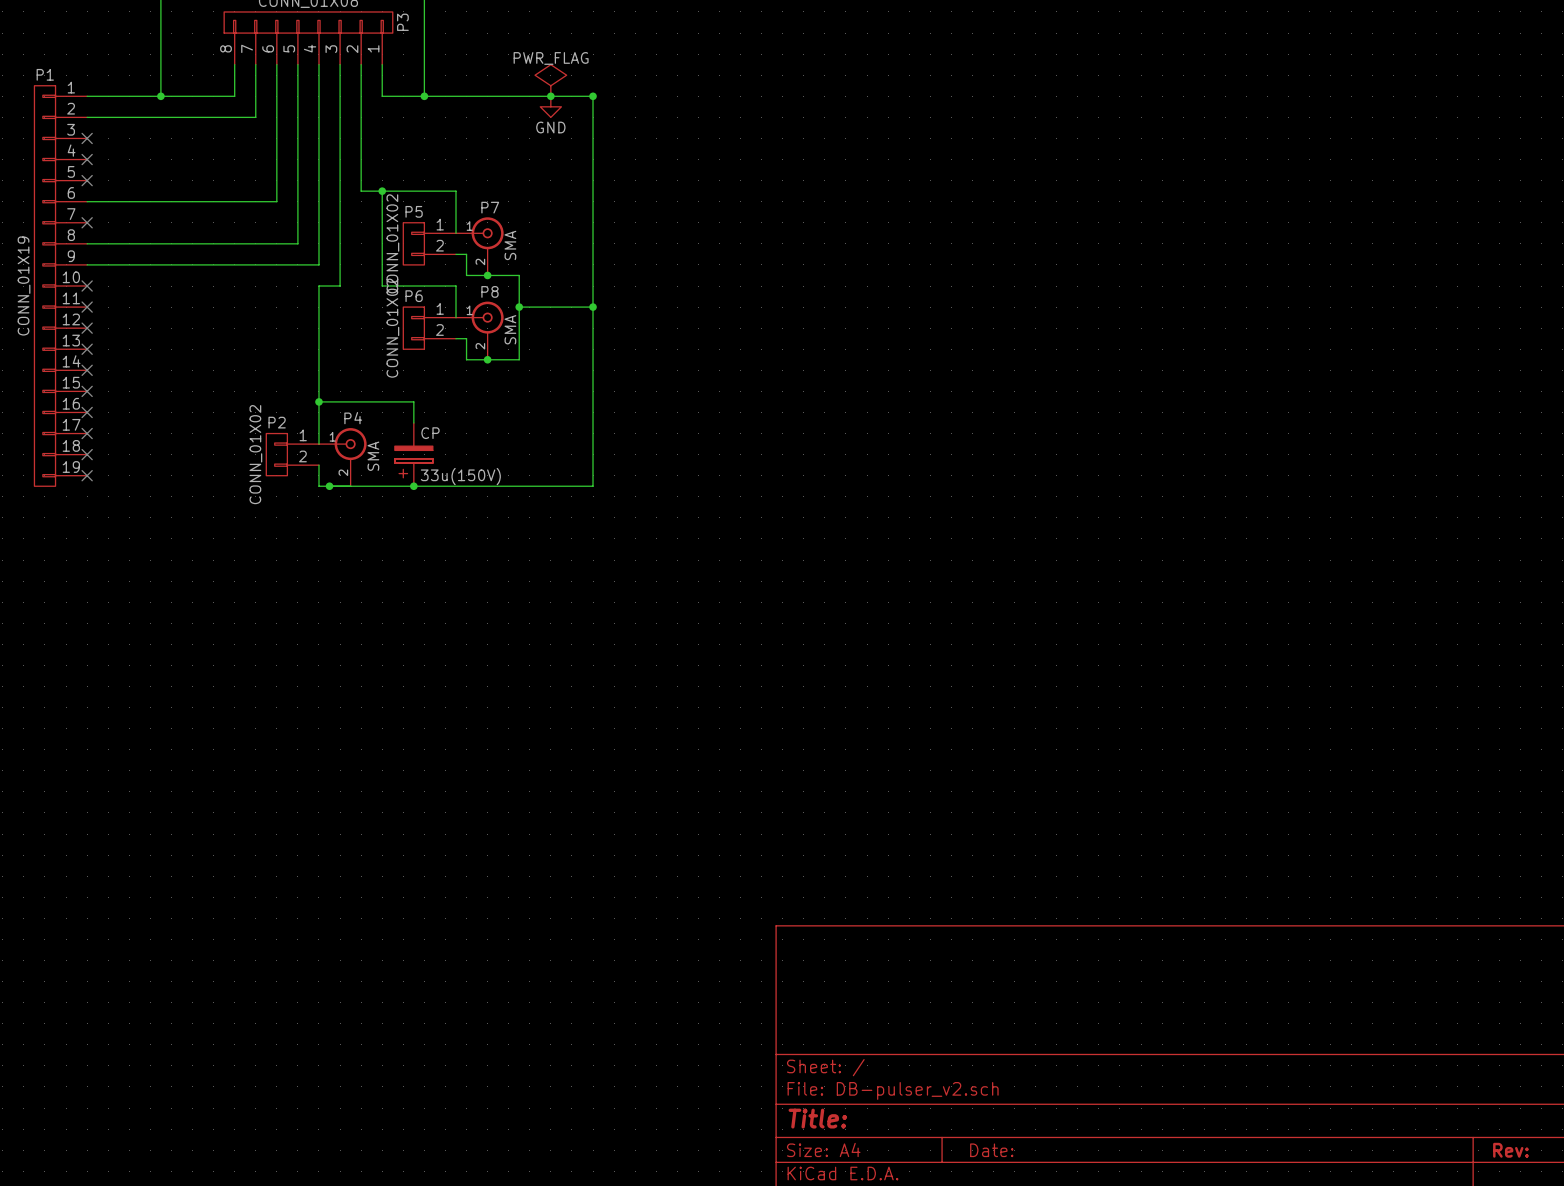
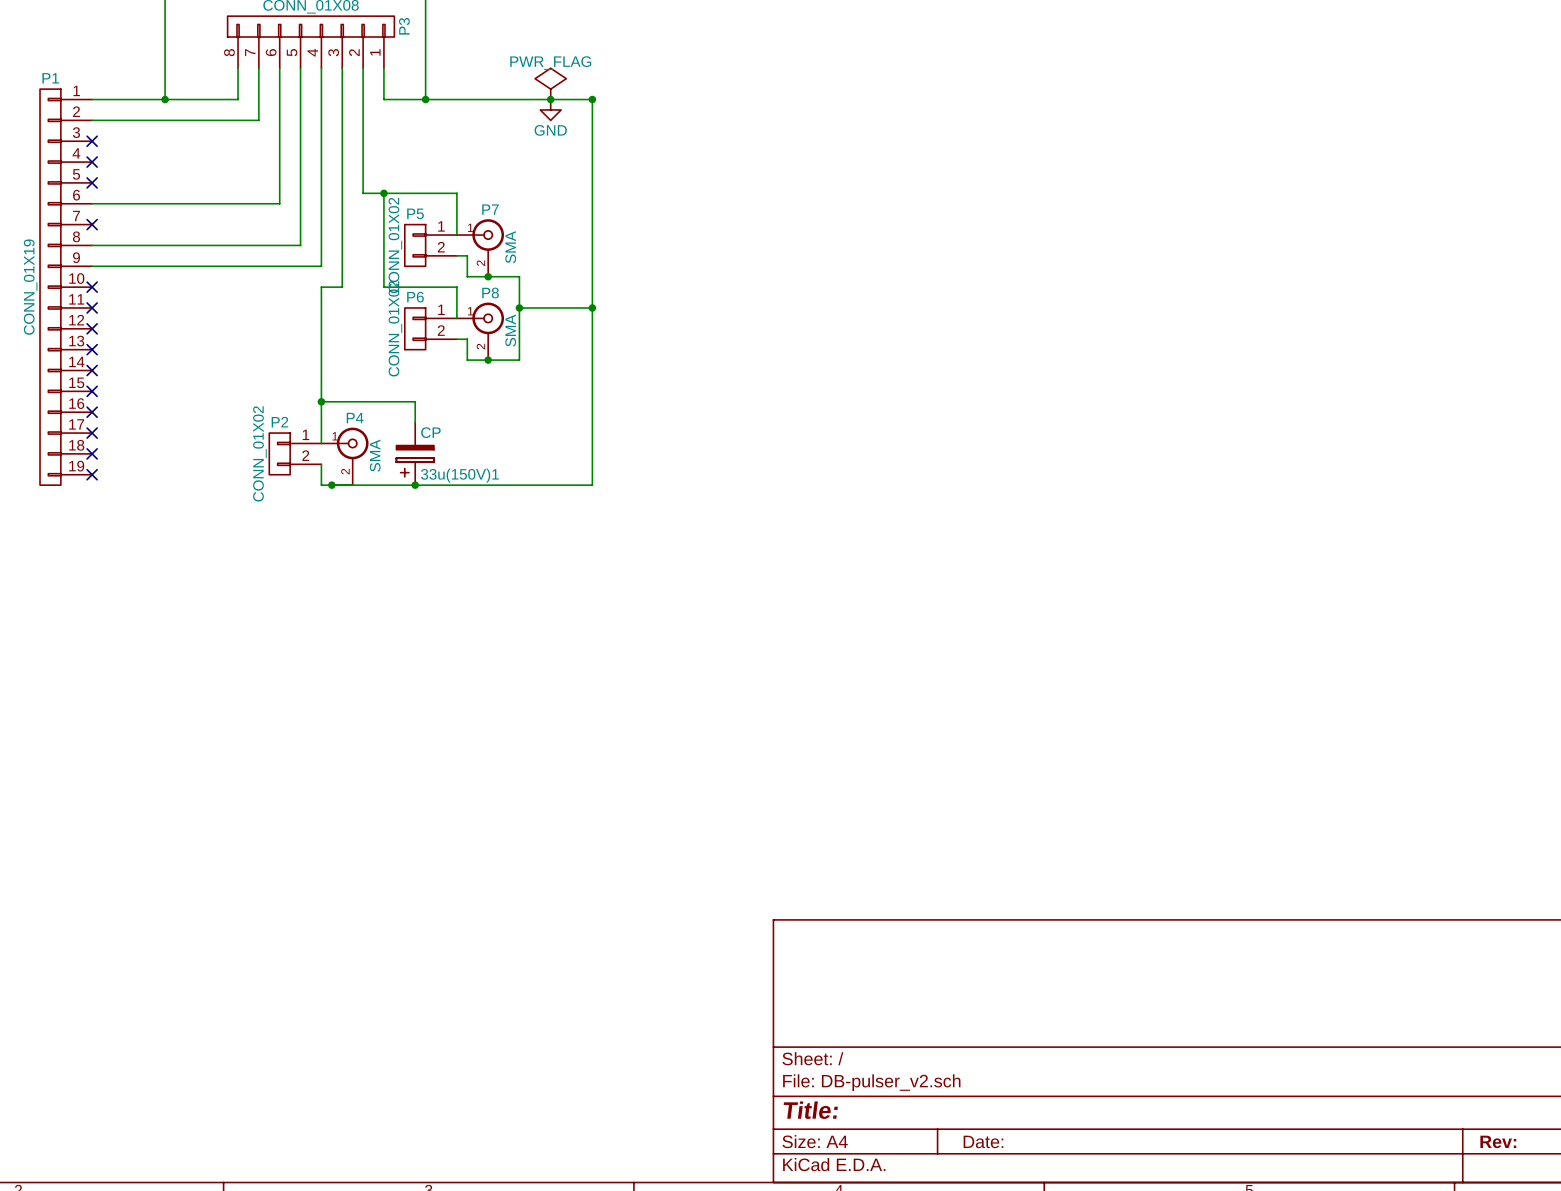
33u(150V) name: 33u(150V) (460, 476) -> 33u(150V)1 (459, 475)

